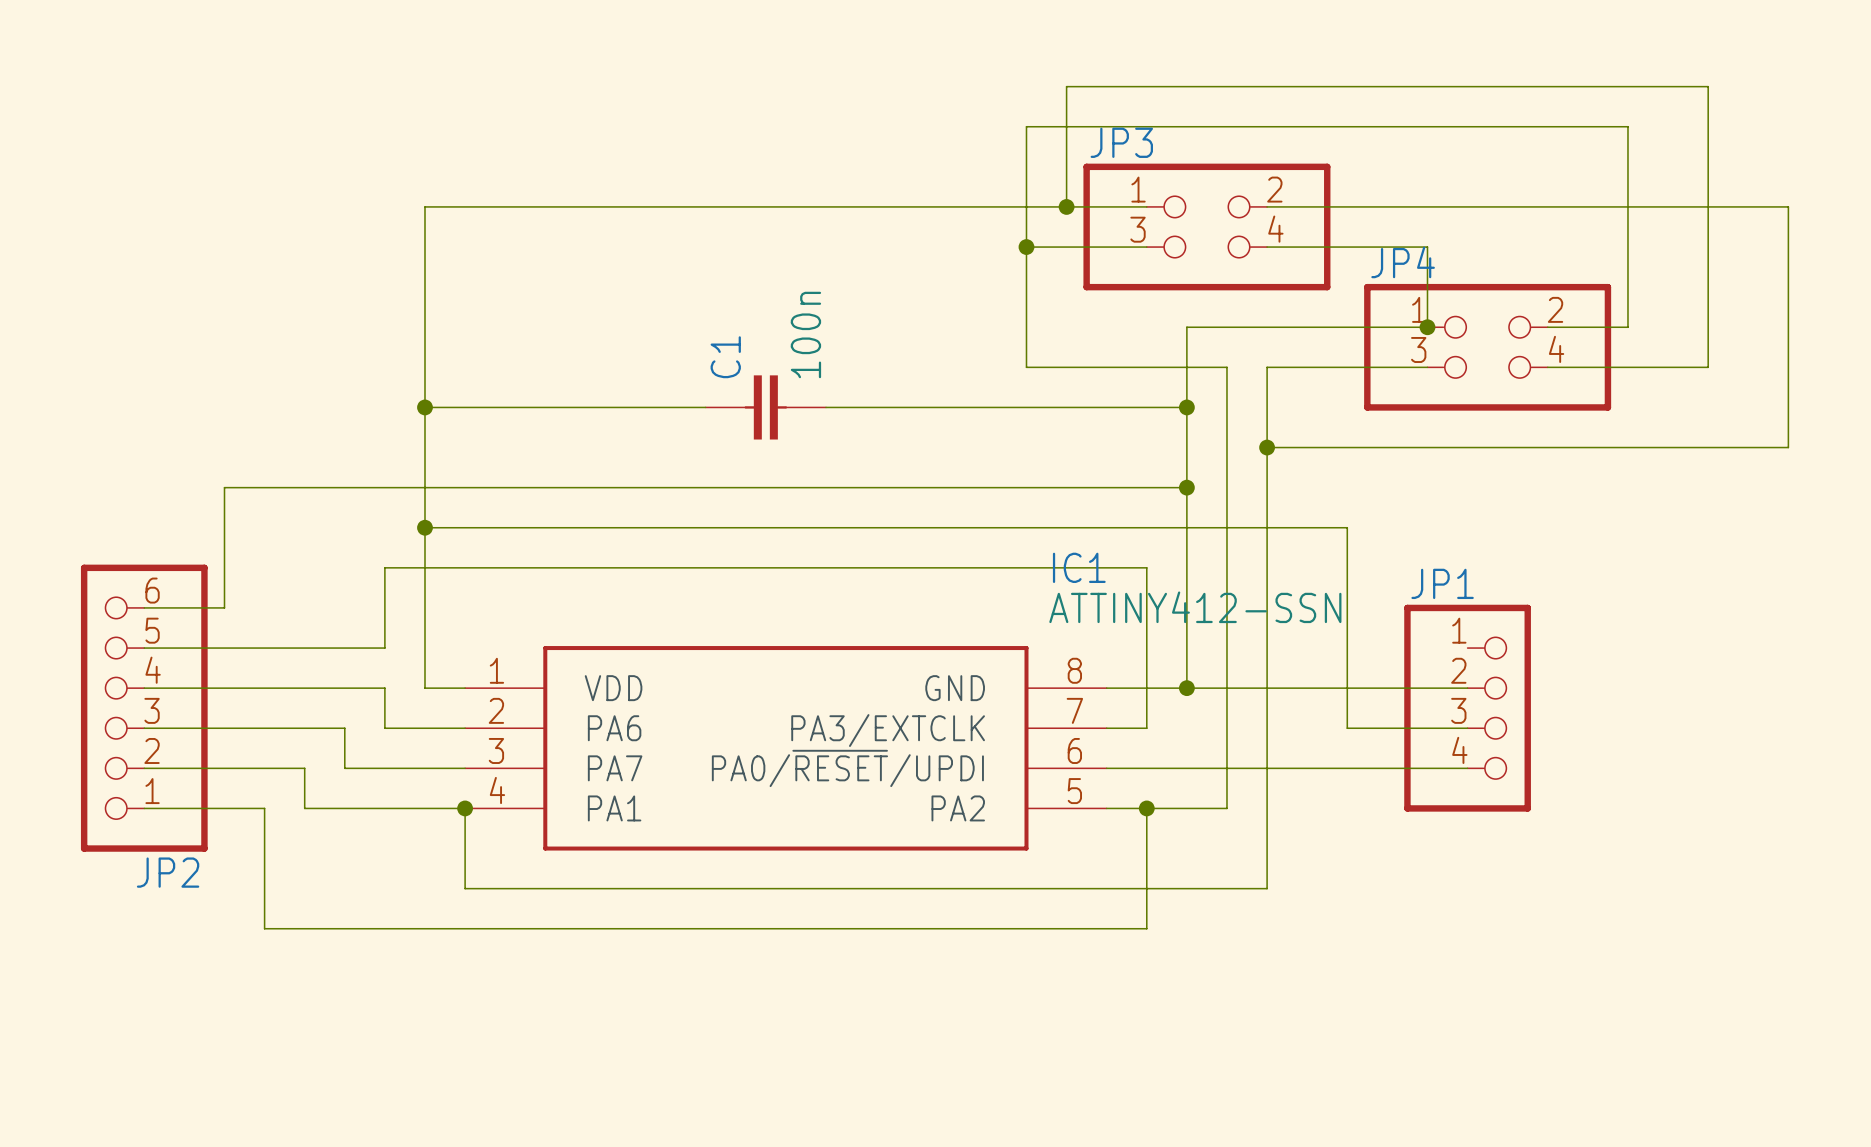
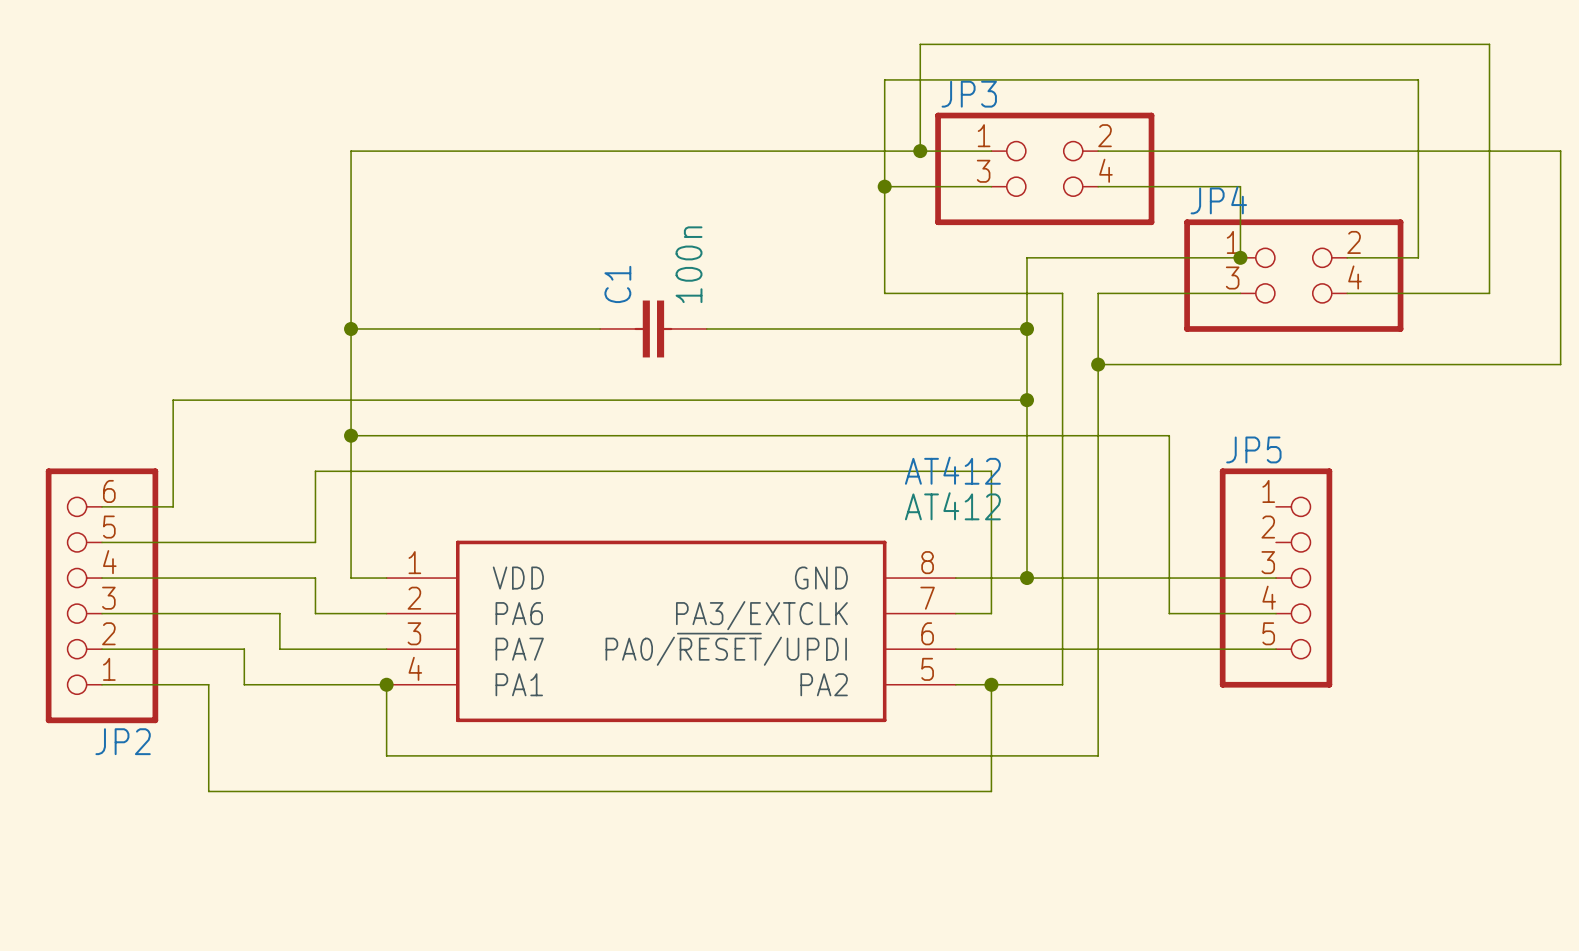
IC1 name: IC1 (1079, 567) -> AT412 (952, 470)
IC1 value: ATTINY412-SSN (1195, 607) -> AT412 (952, 506)
JP5: none -> (1276, 578)
JP1: (1467, 708) -> none

